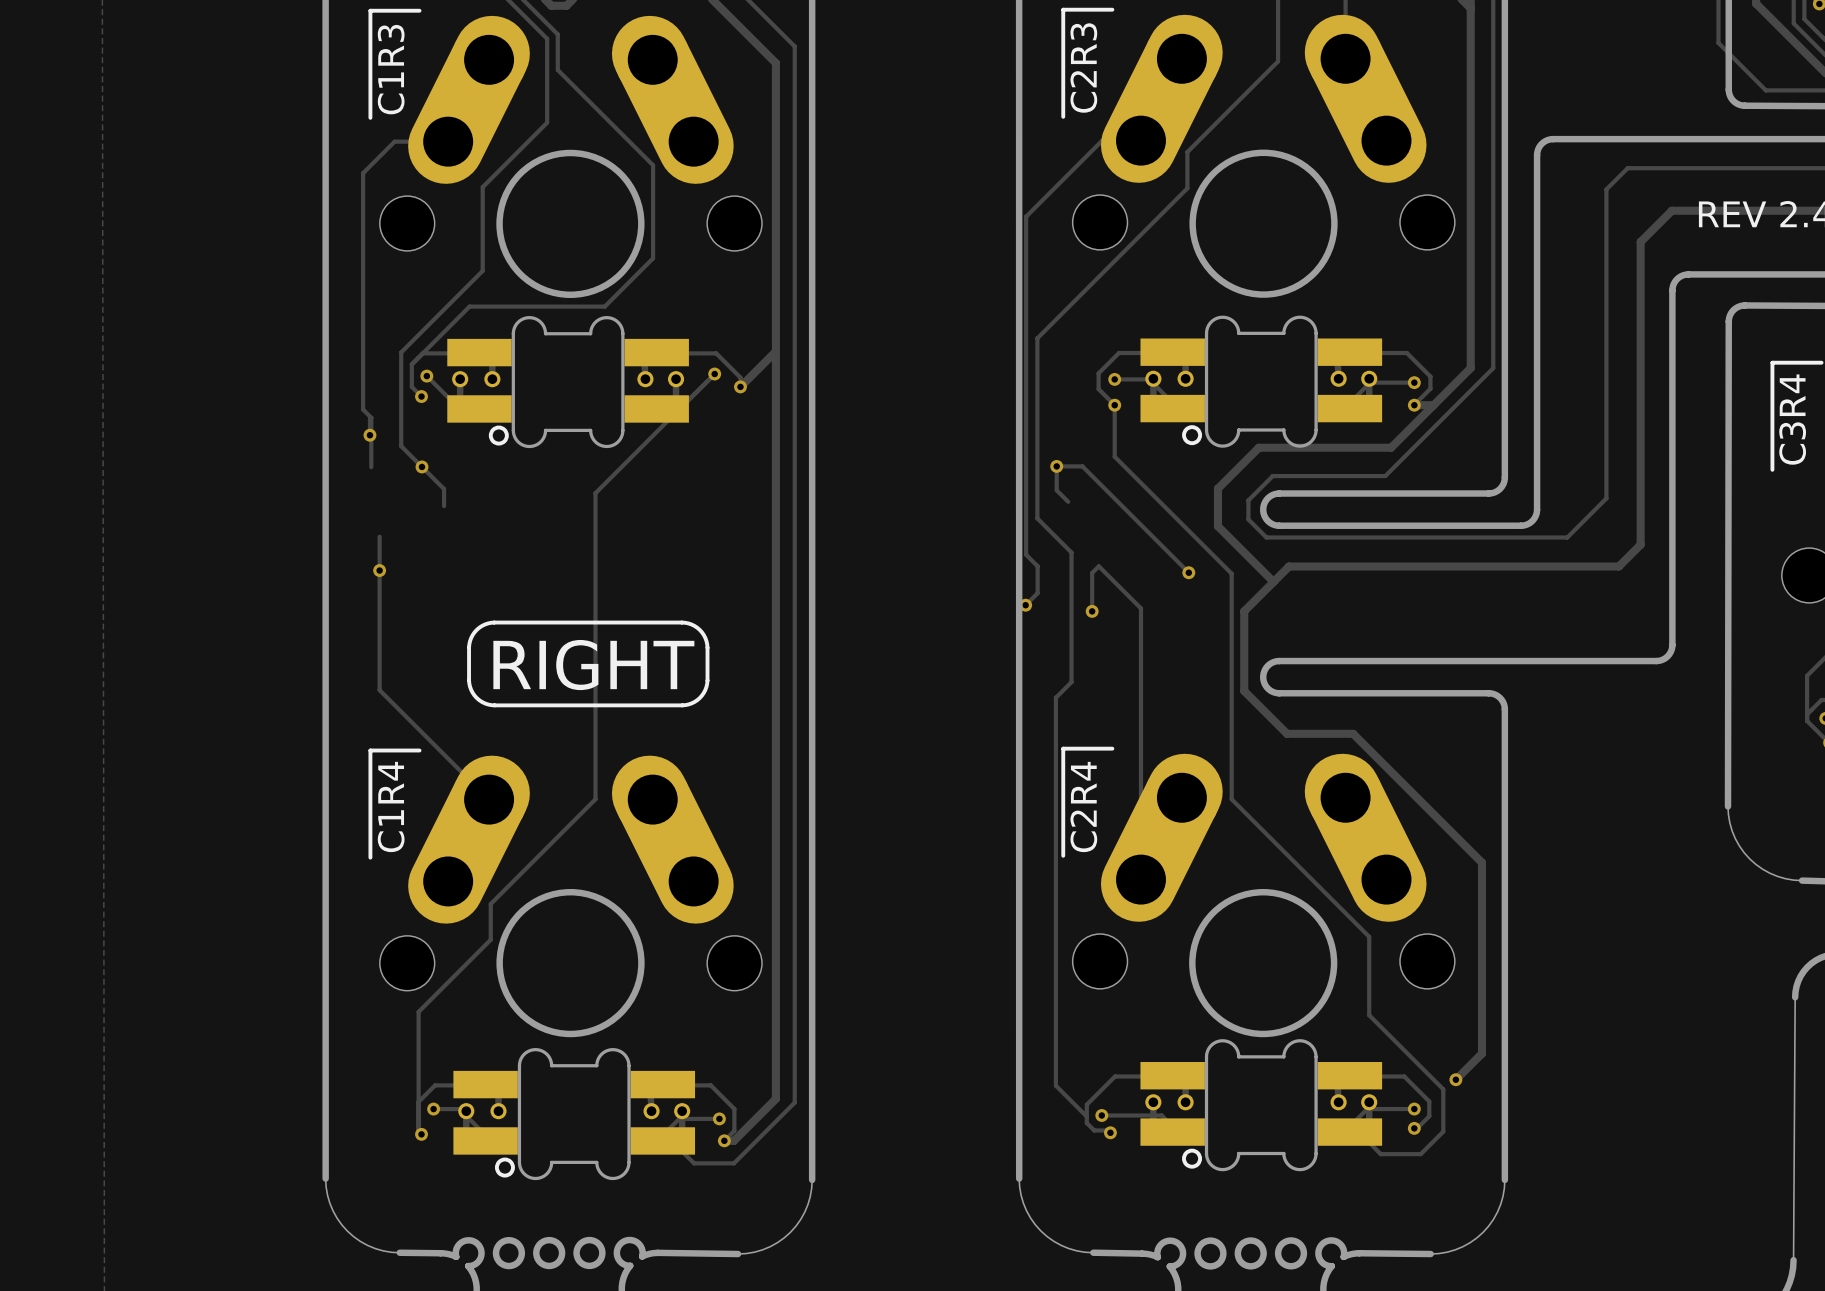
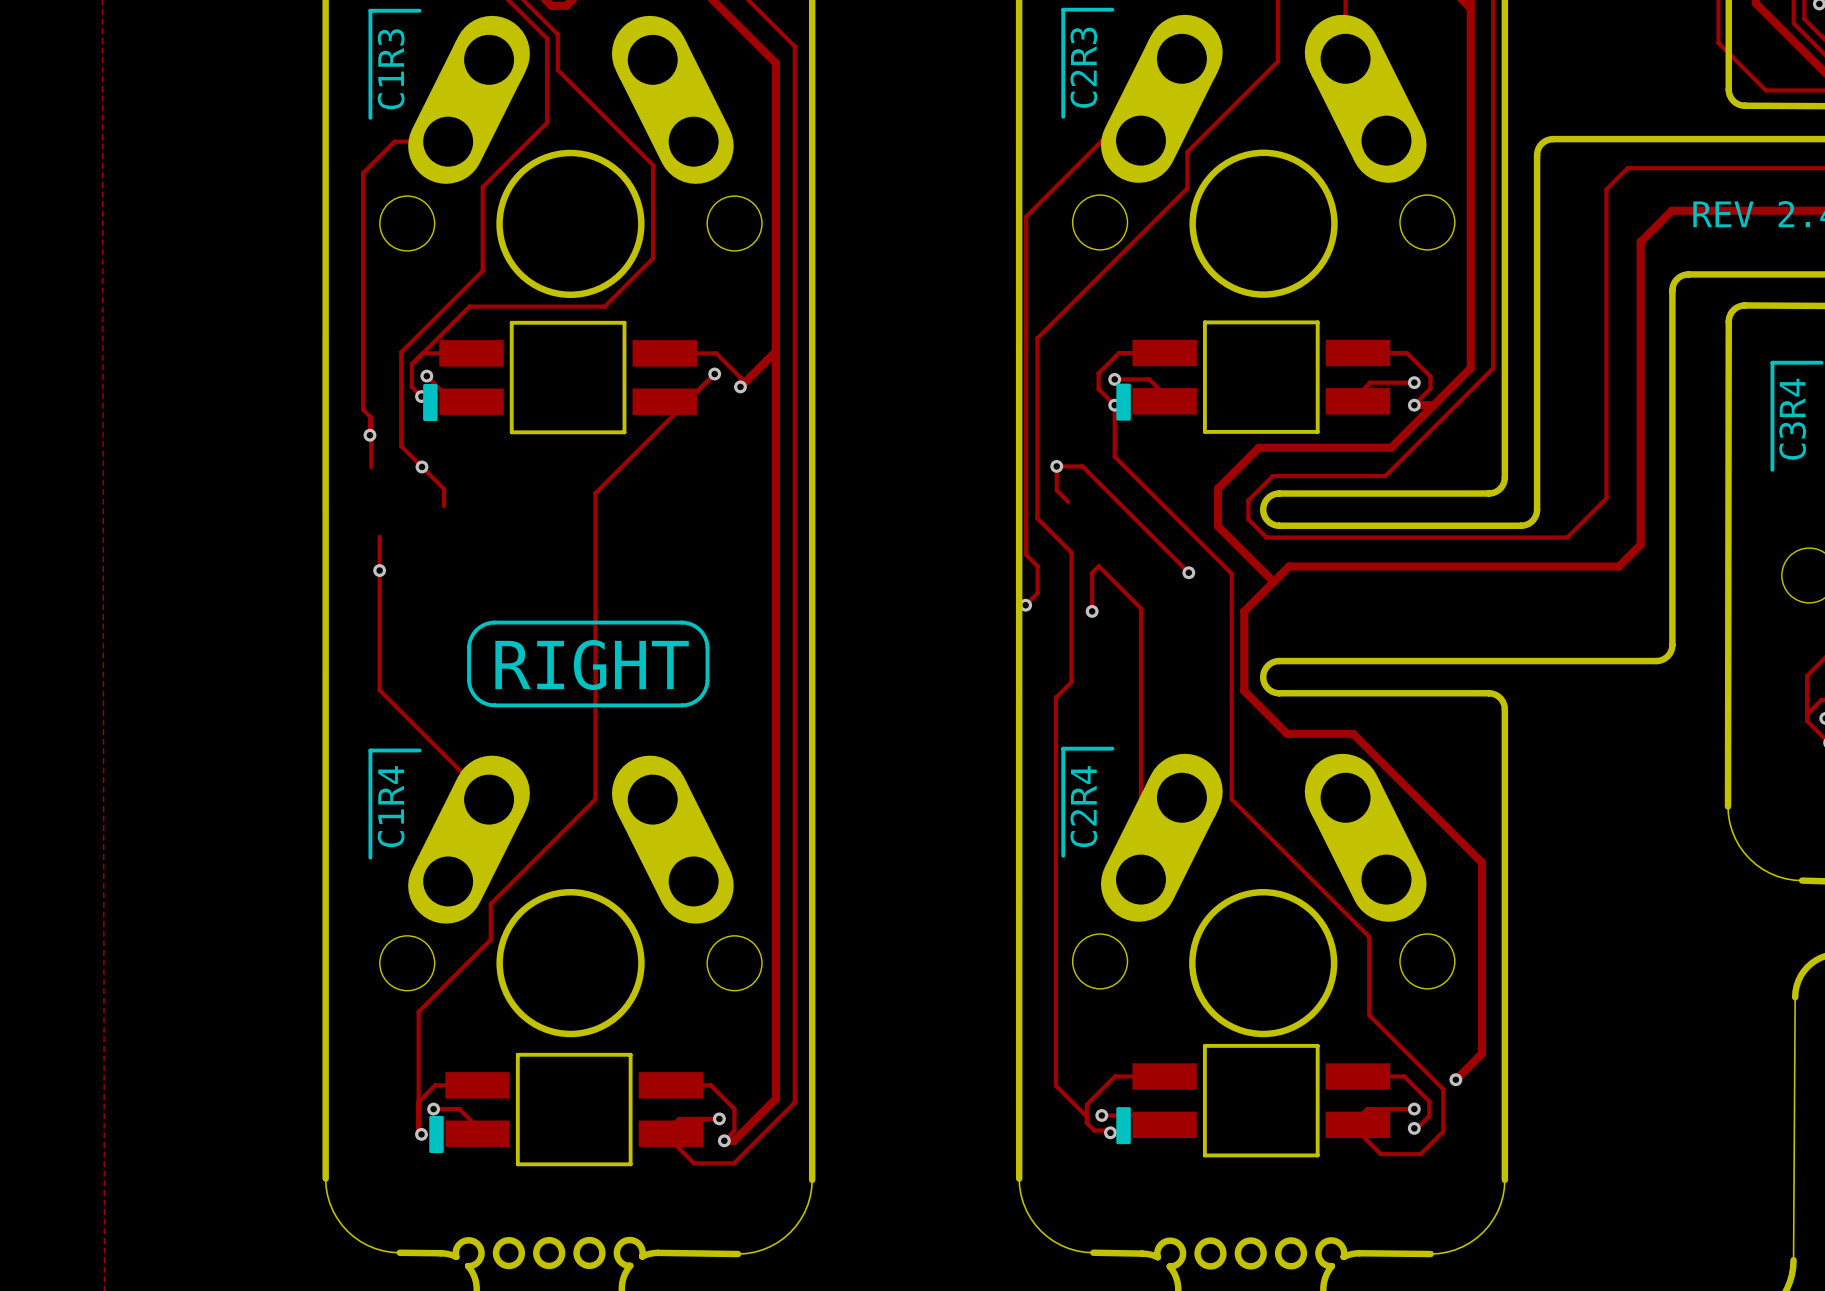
part footprint: [1140, 315, 1383, 448] -> [1116, 320, 1391, 434]
part footprint: [447, 316, 689, 449] -> [423, 320, 697, 435]
part footprint: [1140, 1039, 1383, 1172] -> [1116, 1043, 1391, 1158]
part footprint: [453, 1048, 696, 1181] -> [429, 1052, 704, 1167]

